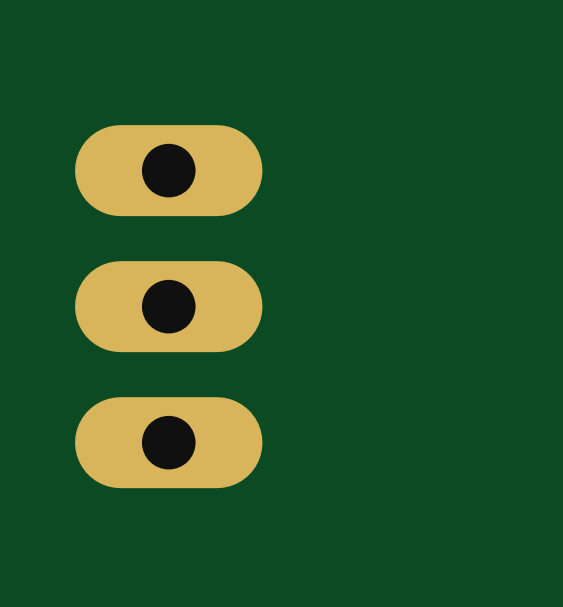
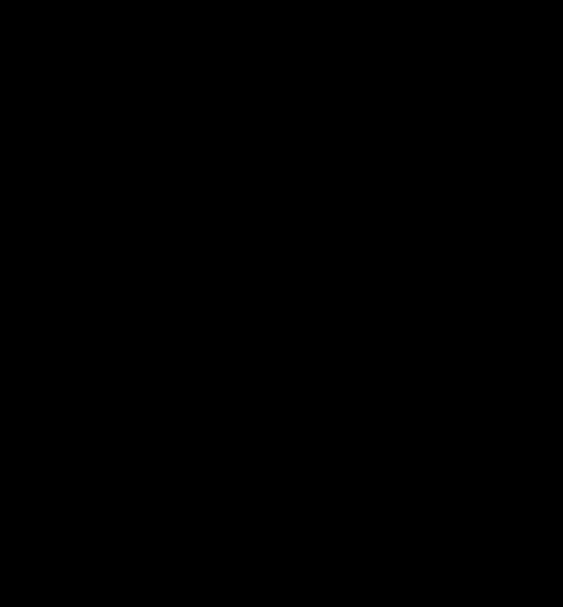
part: (168, 306) -> none

